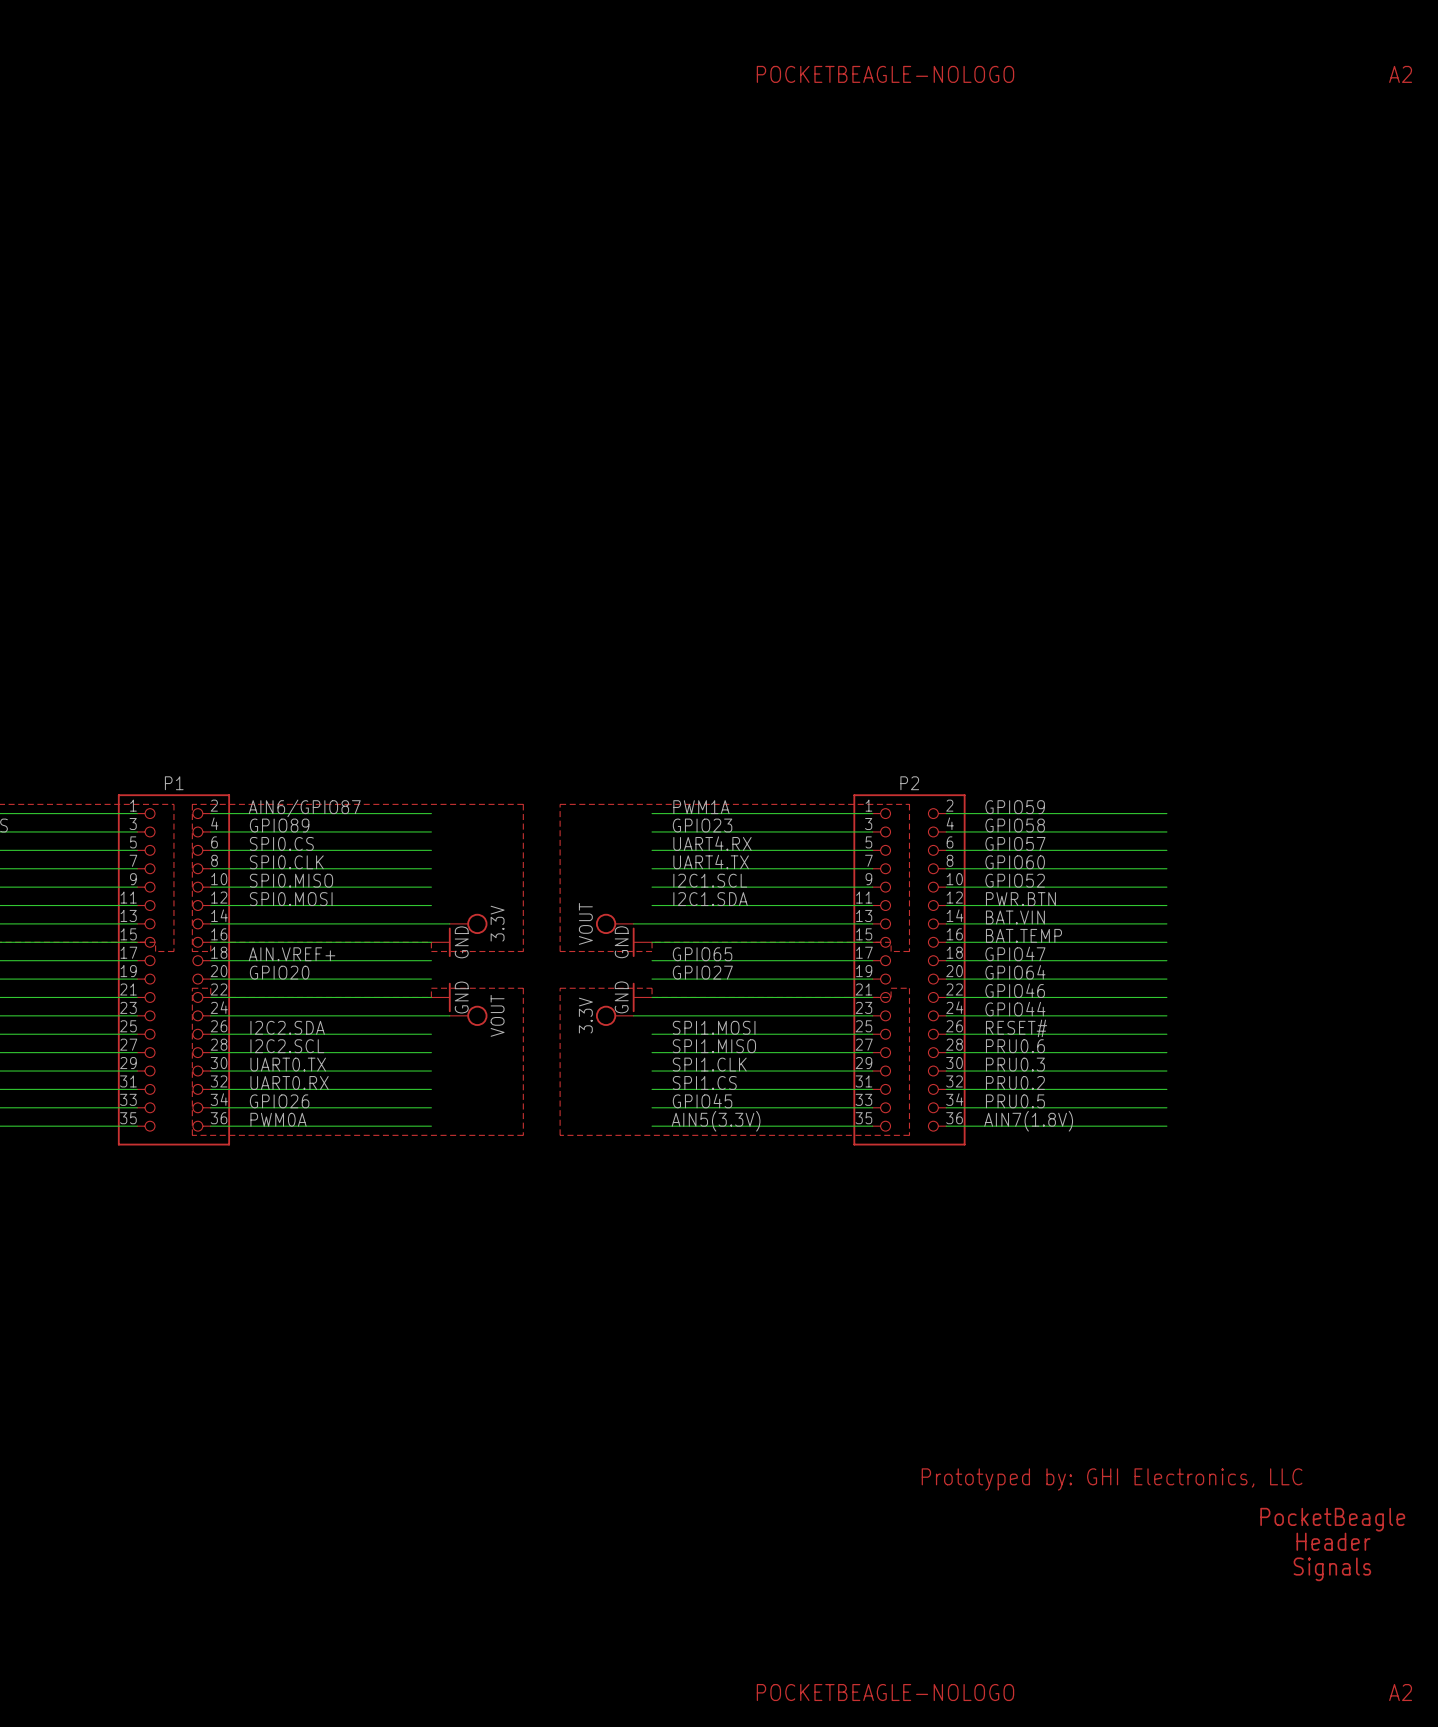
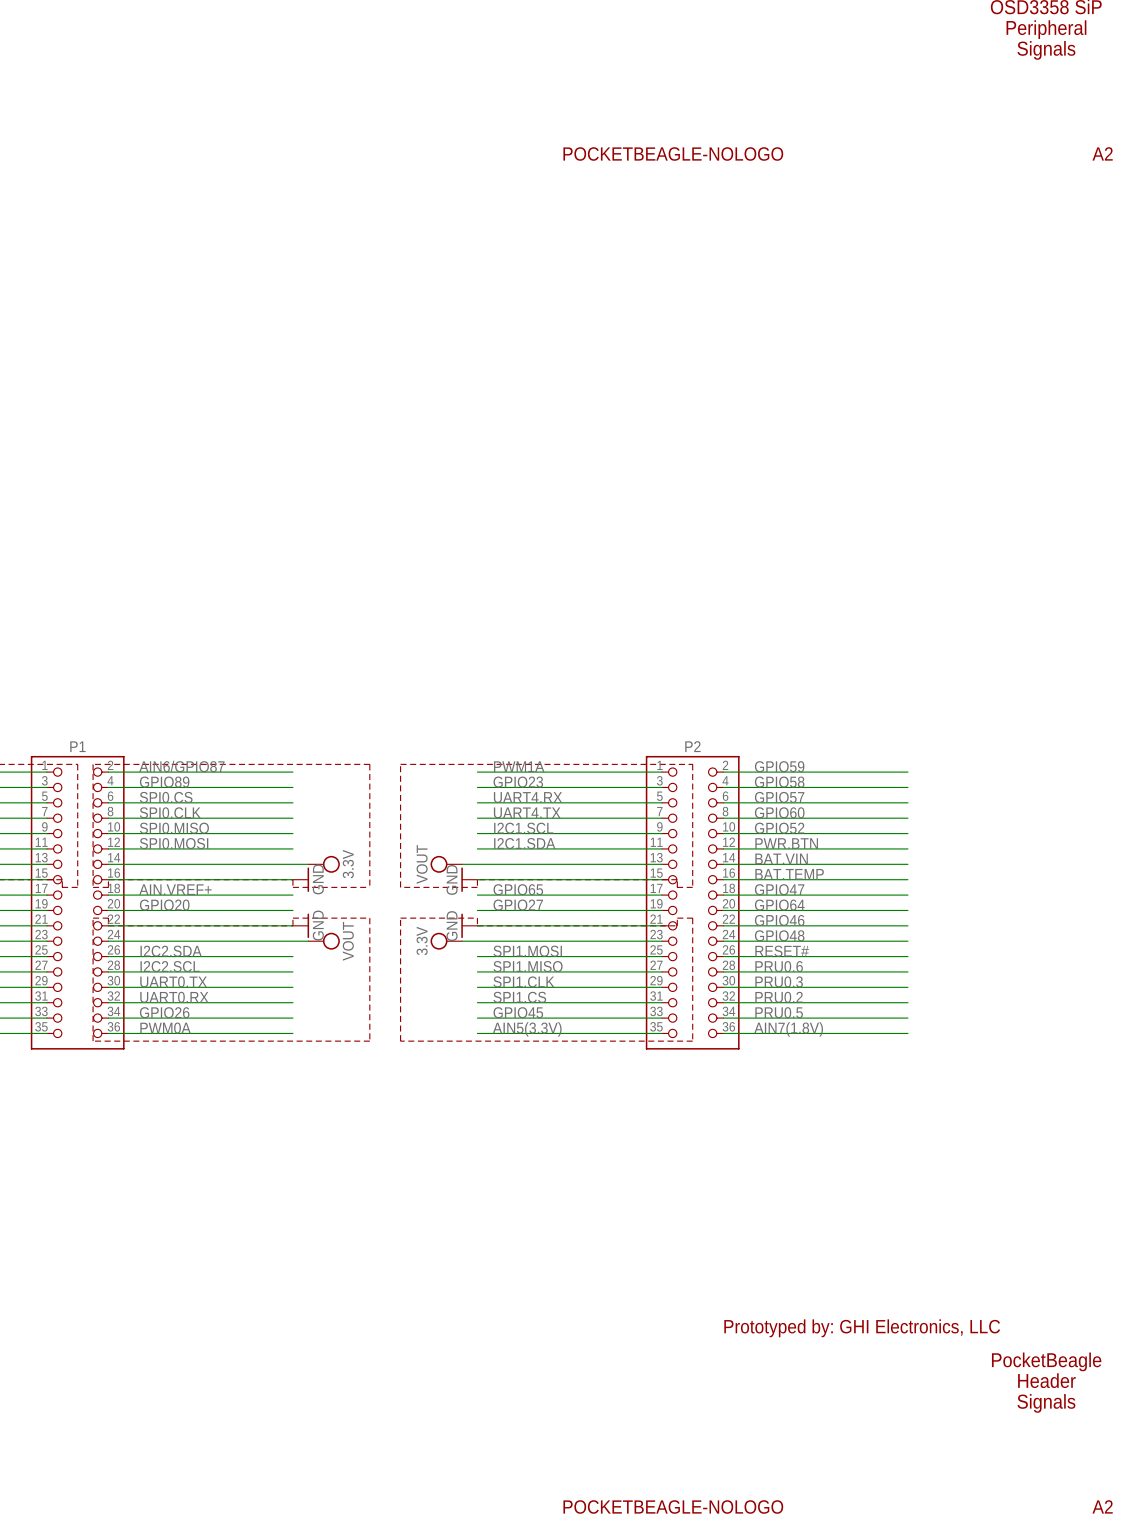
label: GPIO44 (1015, 1009) -> GPIO48 (779, 935)

